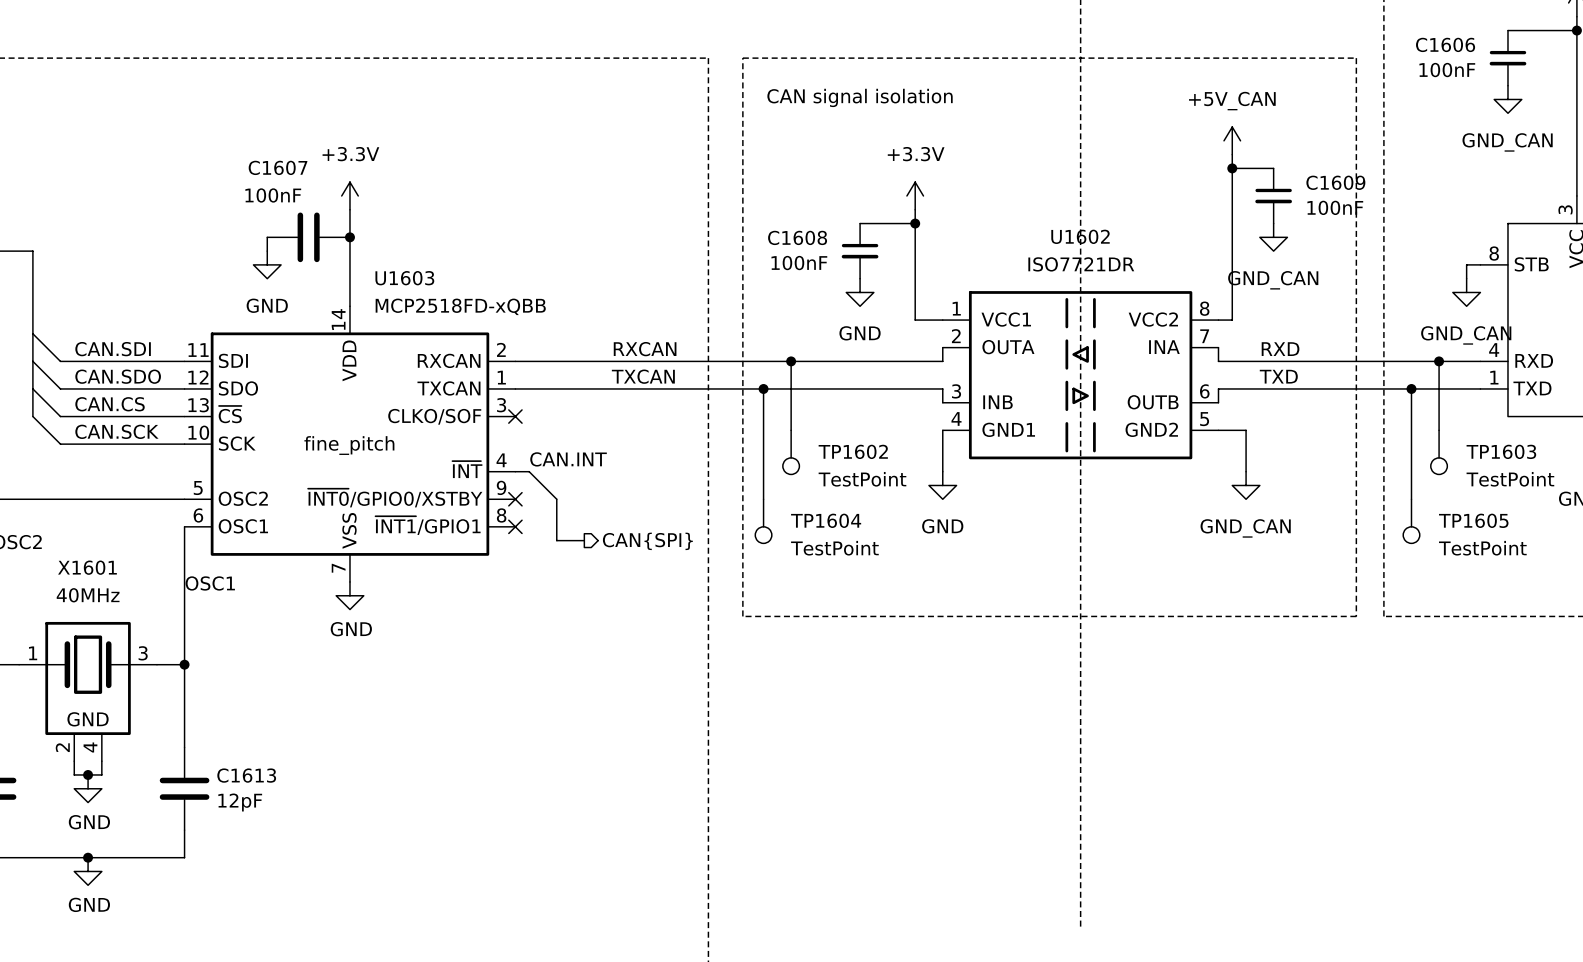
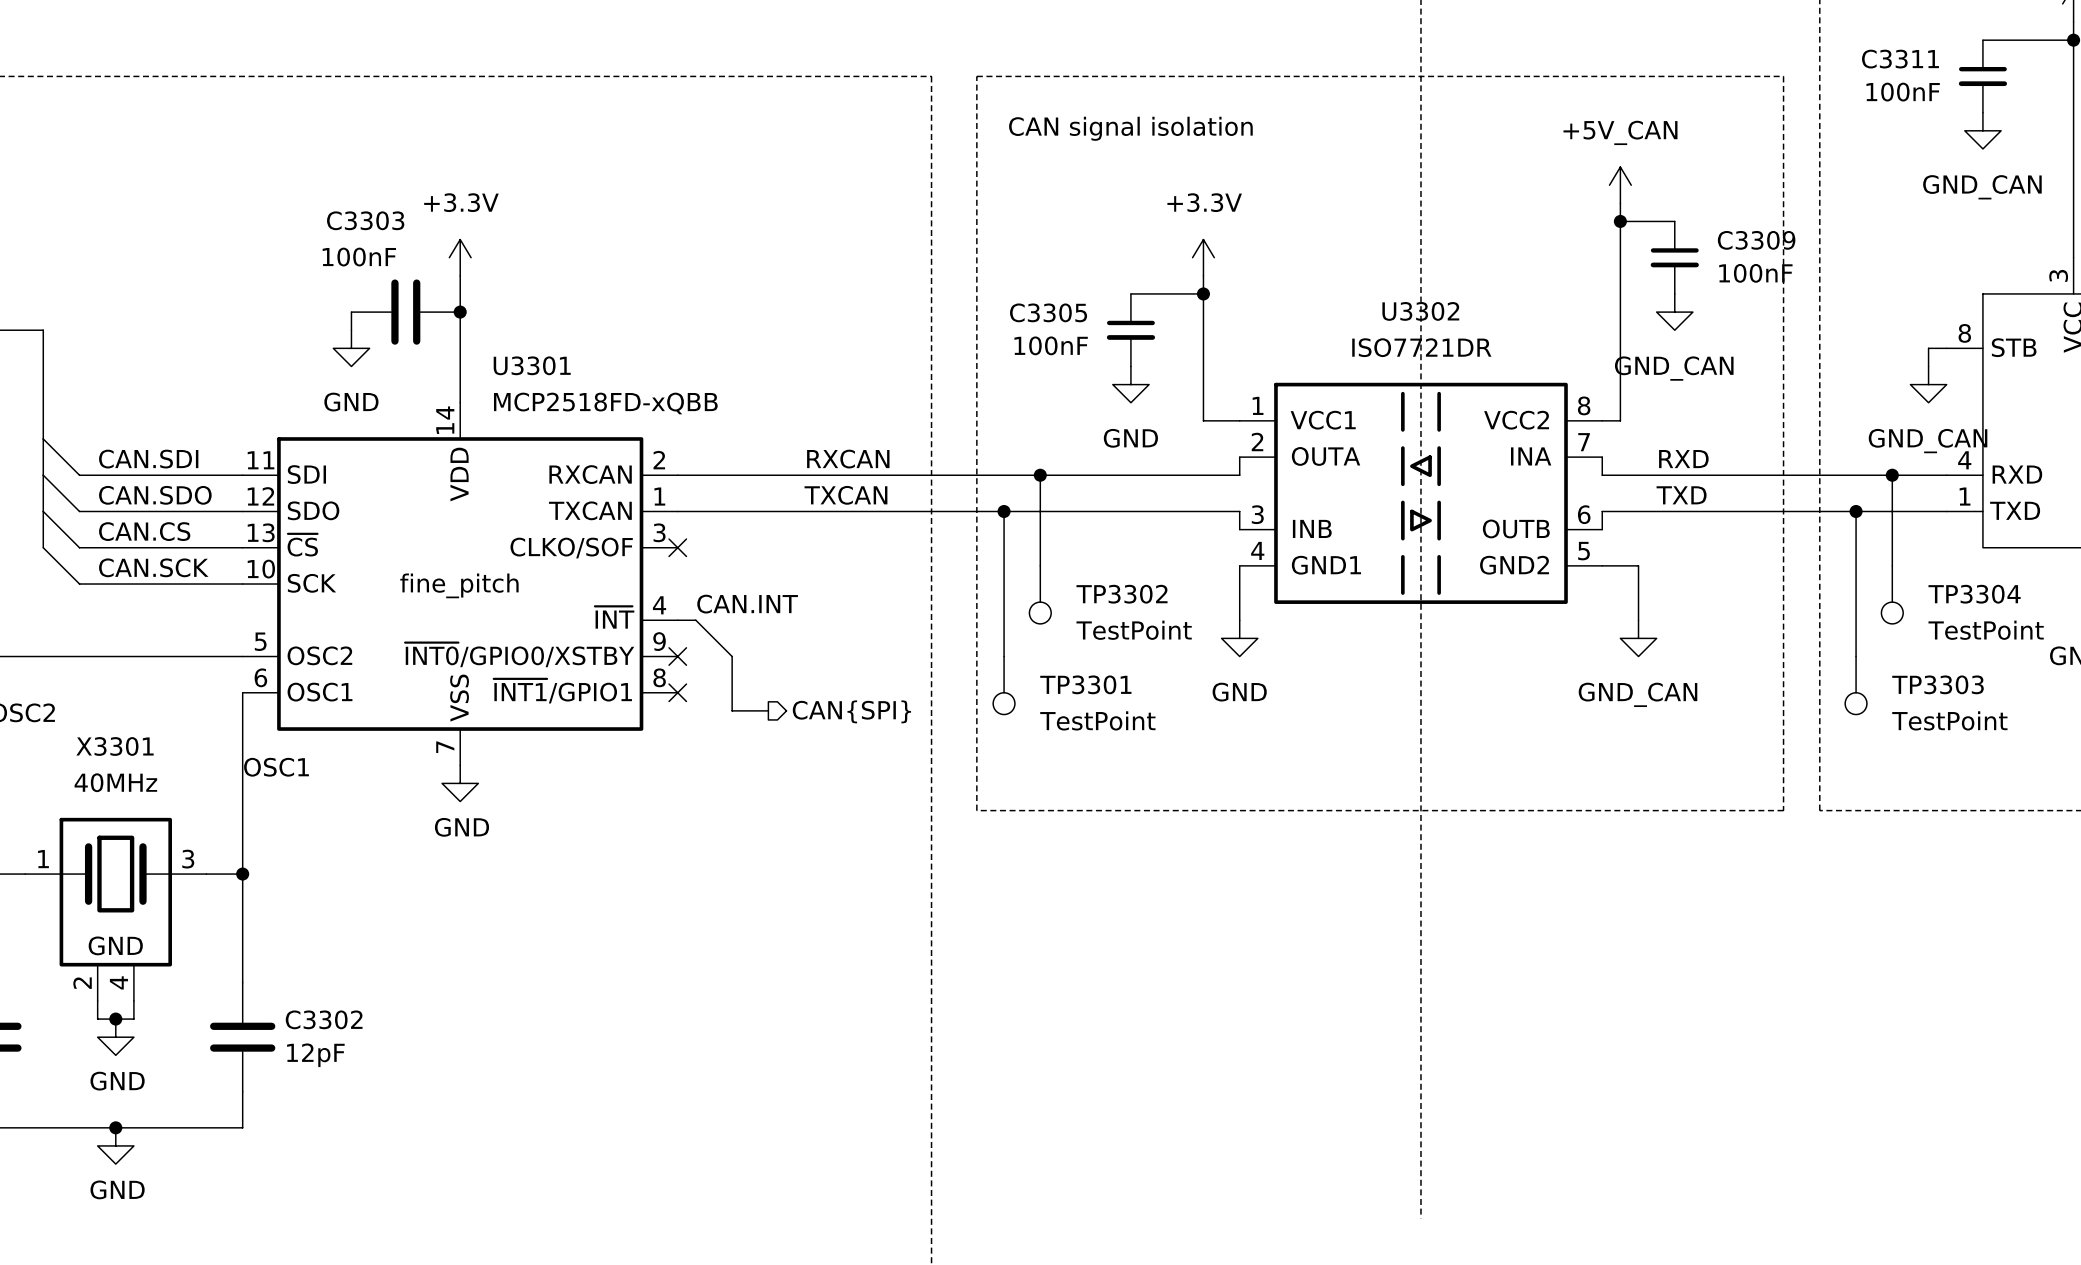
C1606 name: C1606 (1445, 44) -> C3311 (1900, 59)
C1607 name: C1607 (278, 167) -> C3303 (365, 220)
C1609 name: C1609 (1335, 182) -> C3309 (1756, 240)
U1602 name: U1602 (1080, 236) -> U3302 (1420, 311)
C1608 name: C1608 (797, 237) -> C3305 (1048, 312)
U1603 name: U1603 (404, 278) -> U3301 (532, 365)
TP1602 name: TP1602 (853, 451) -> TP3302 (1122, 594)
TP1603 name: TP1603 (1501, 451) -> TP3304 (1974, 594)
TP1604 name: TP1604 (826, 520) -> TP3301 (1085, 684)
TP1605 name: TP1605 (1473, 520) -> TP3303 (1938, 684)
X1601 name: X1601 (87, 567) -> X3301 (115, 746)
C1613 name: C1613 (246, 775) -> C3302 (324, 1019)

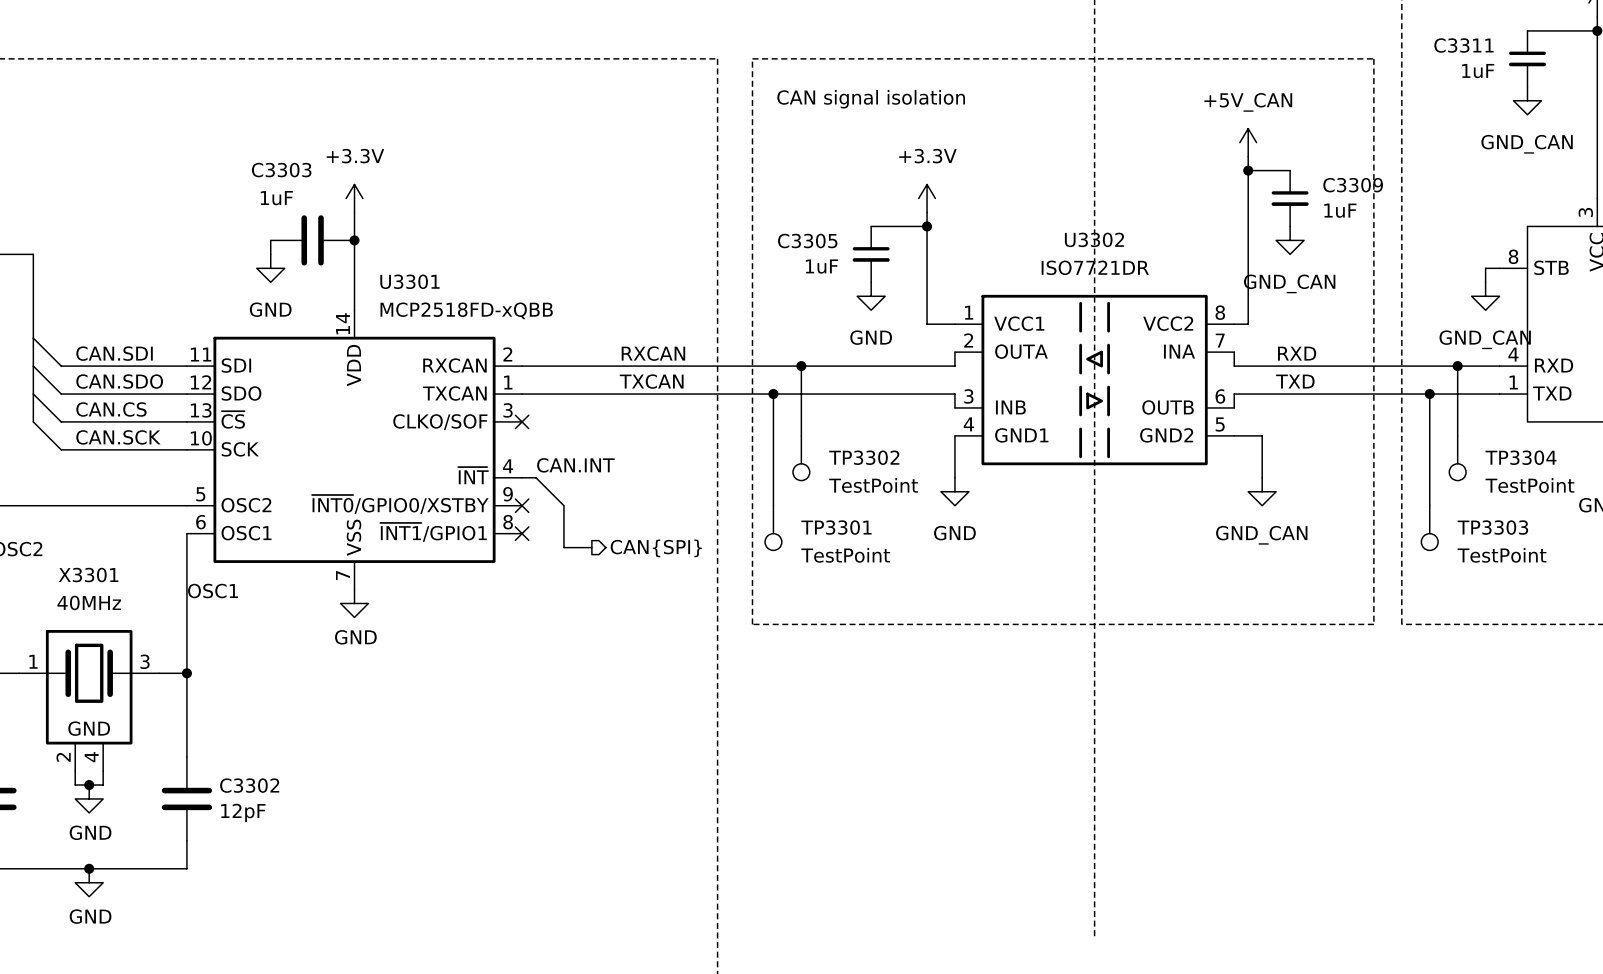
C3311 value: 100nF (1903, 92) -> 1uF (1478, 71)
C3303 value: 100nF (359, 257) -> 1uF (276, 198)
C3309 value: 100nF (1755, 273) -> 1uF (1340, 210)
C3305 value: 100nF (1051, 345) -> 1uF (821, 266)
U3301 text: fine_pitch (459, 585) -> none

